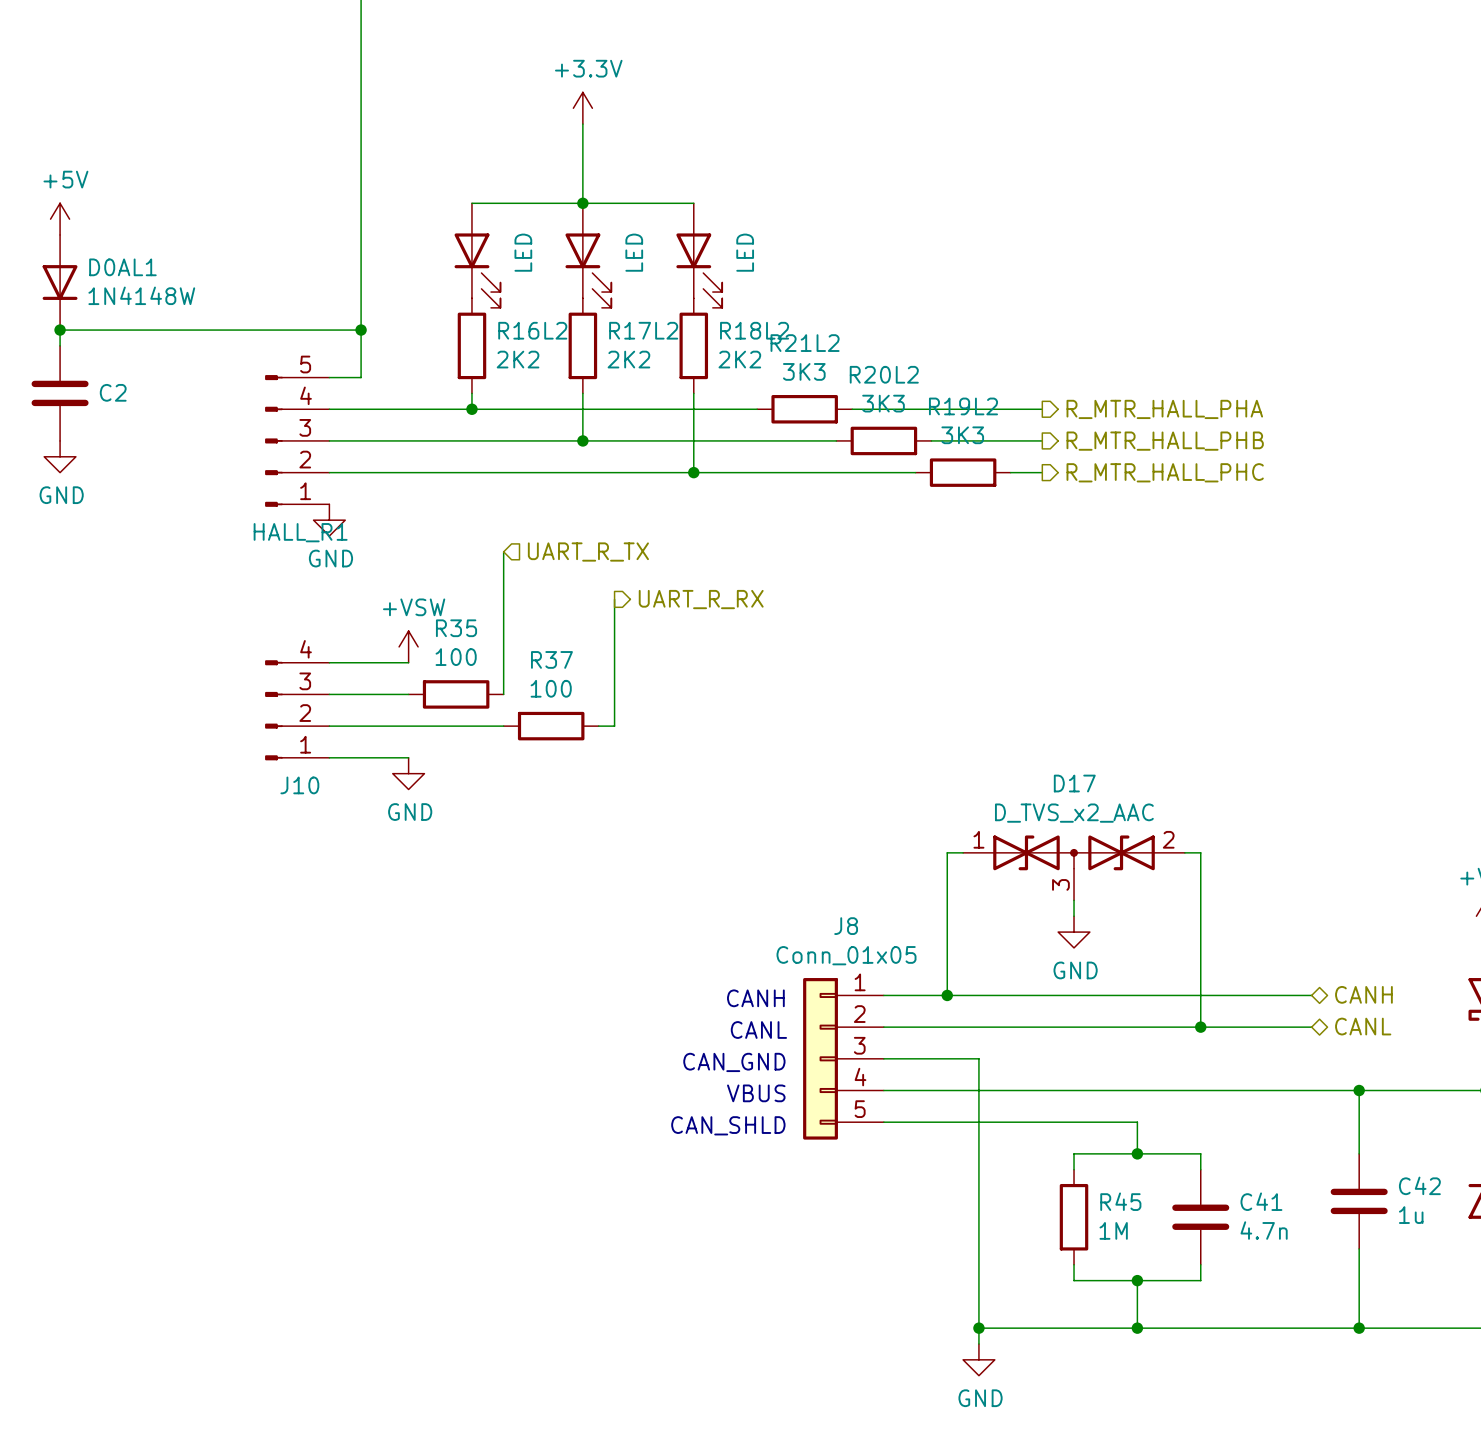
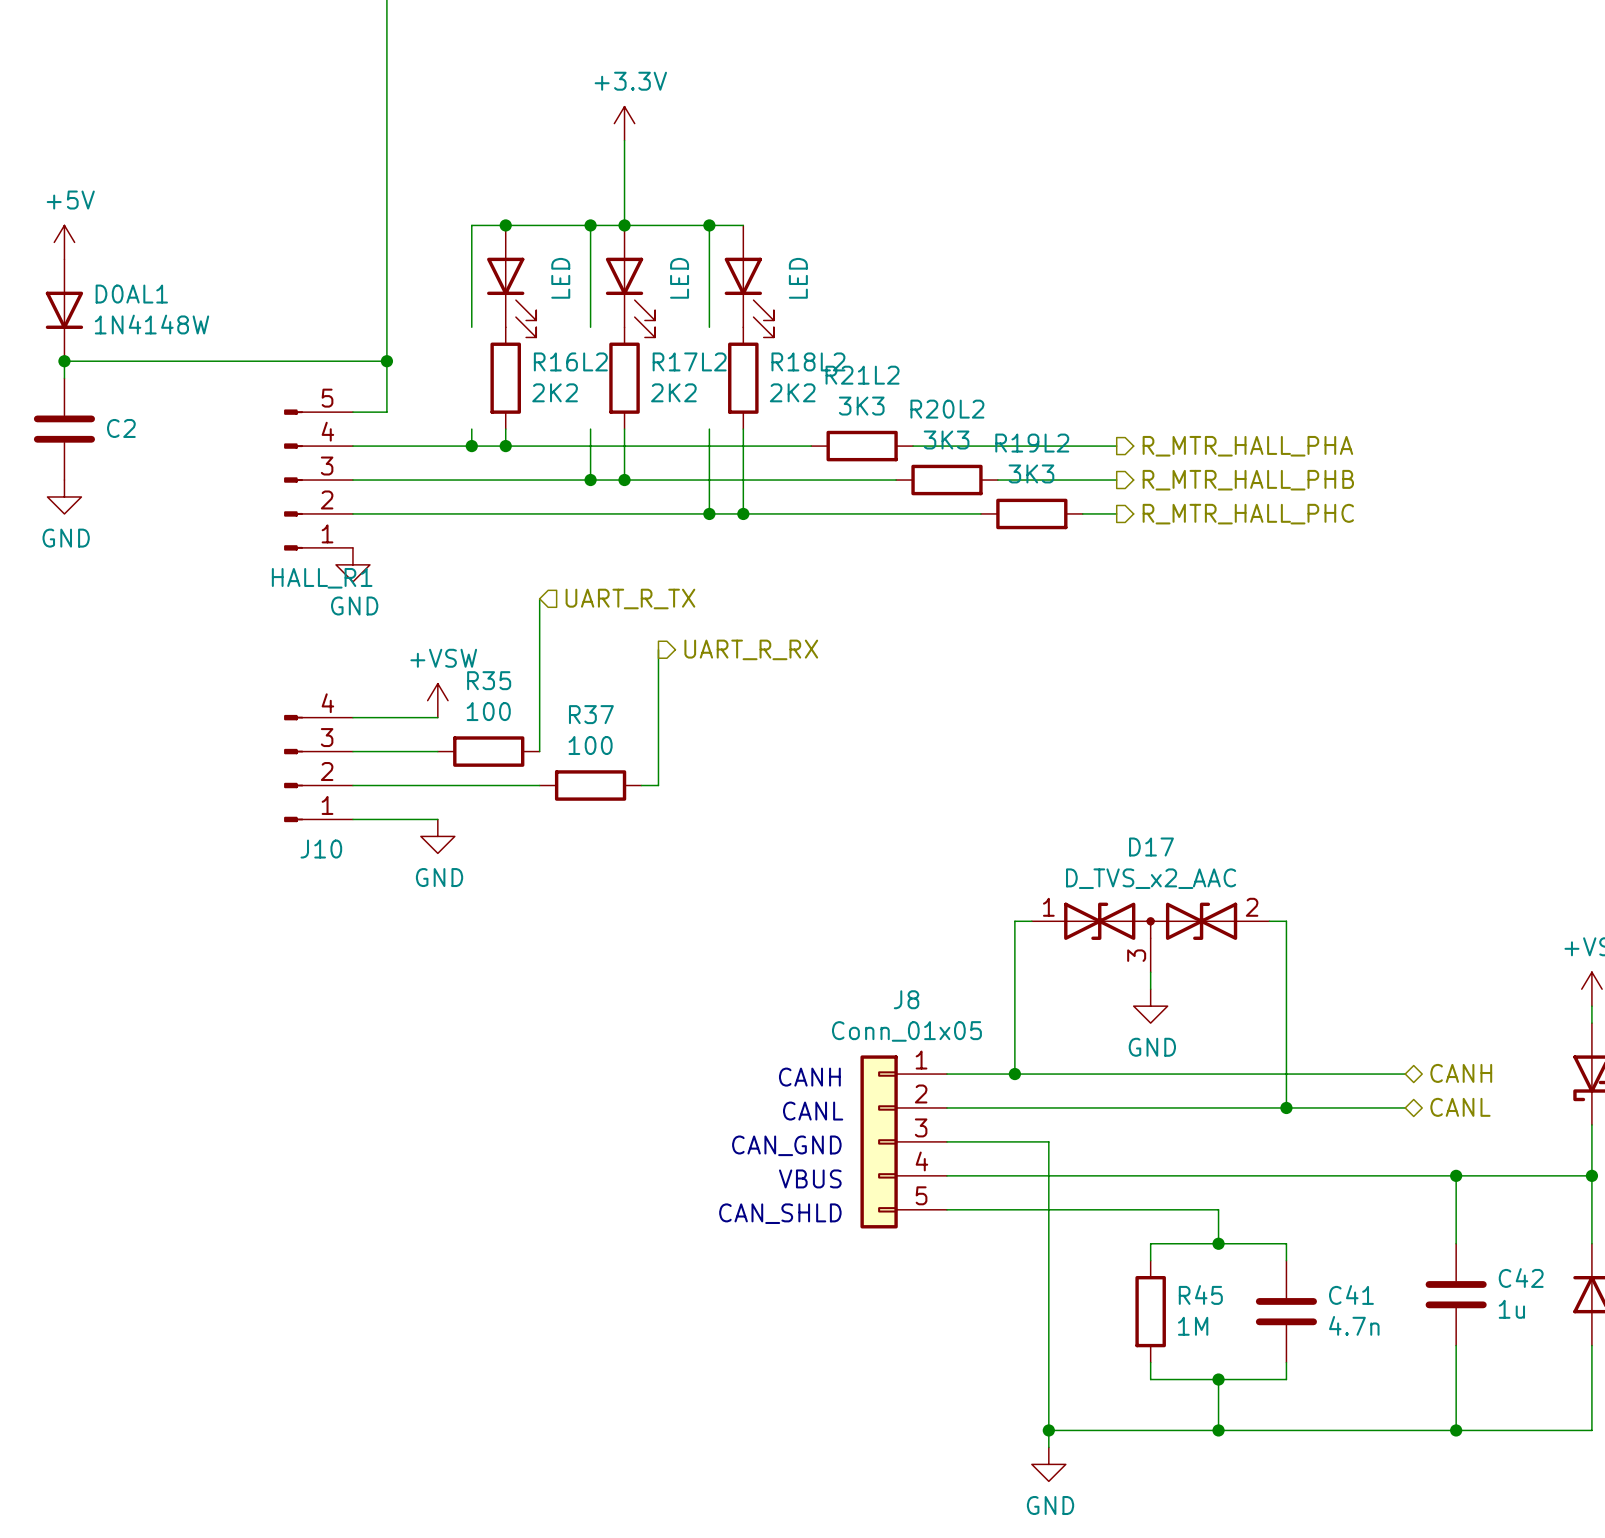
wire: none -> (505, 225) (471, 225) (471, 327)
junction: none -> (505, 225)
wire: none -> (590, 225) (590, 327)
junction: none -> (590, 225)
wire: none -> (709, 225) (709, 327)
junction: none -> (709, 225)
wire: none -> (471, 429) (471, 446)
wire: none -> (590, 429) (590, 480)
wire: none -> (709, 429) (709, 513)
junction: none -> (471, 446)
junction: none -> (590, 480)
junction: none -> (709, 513)

